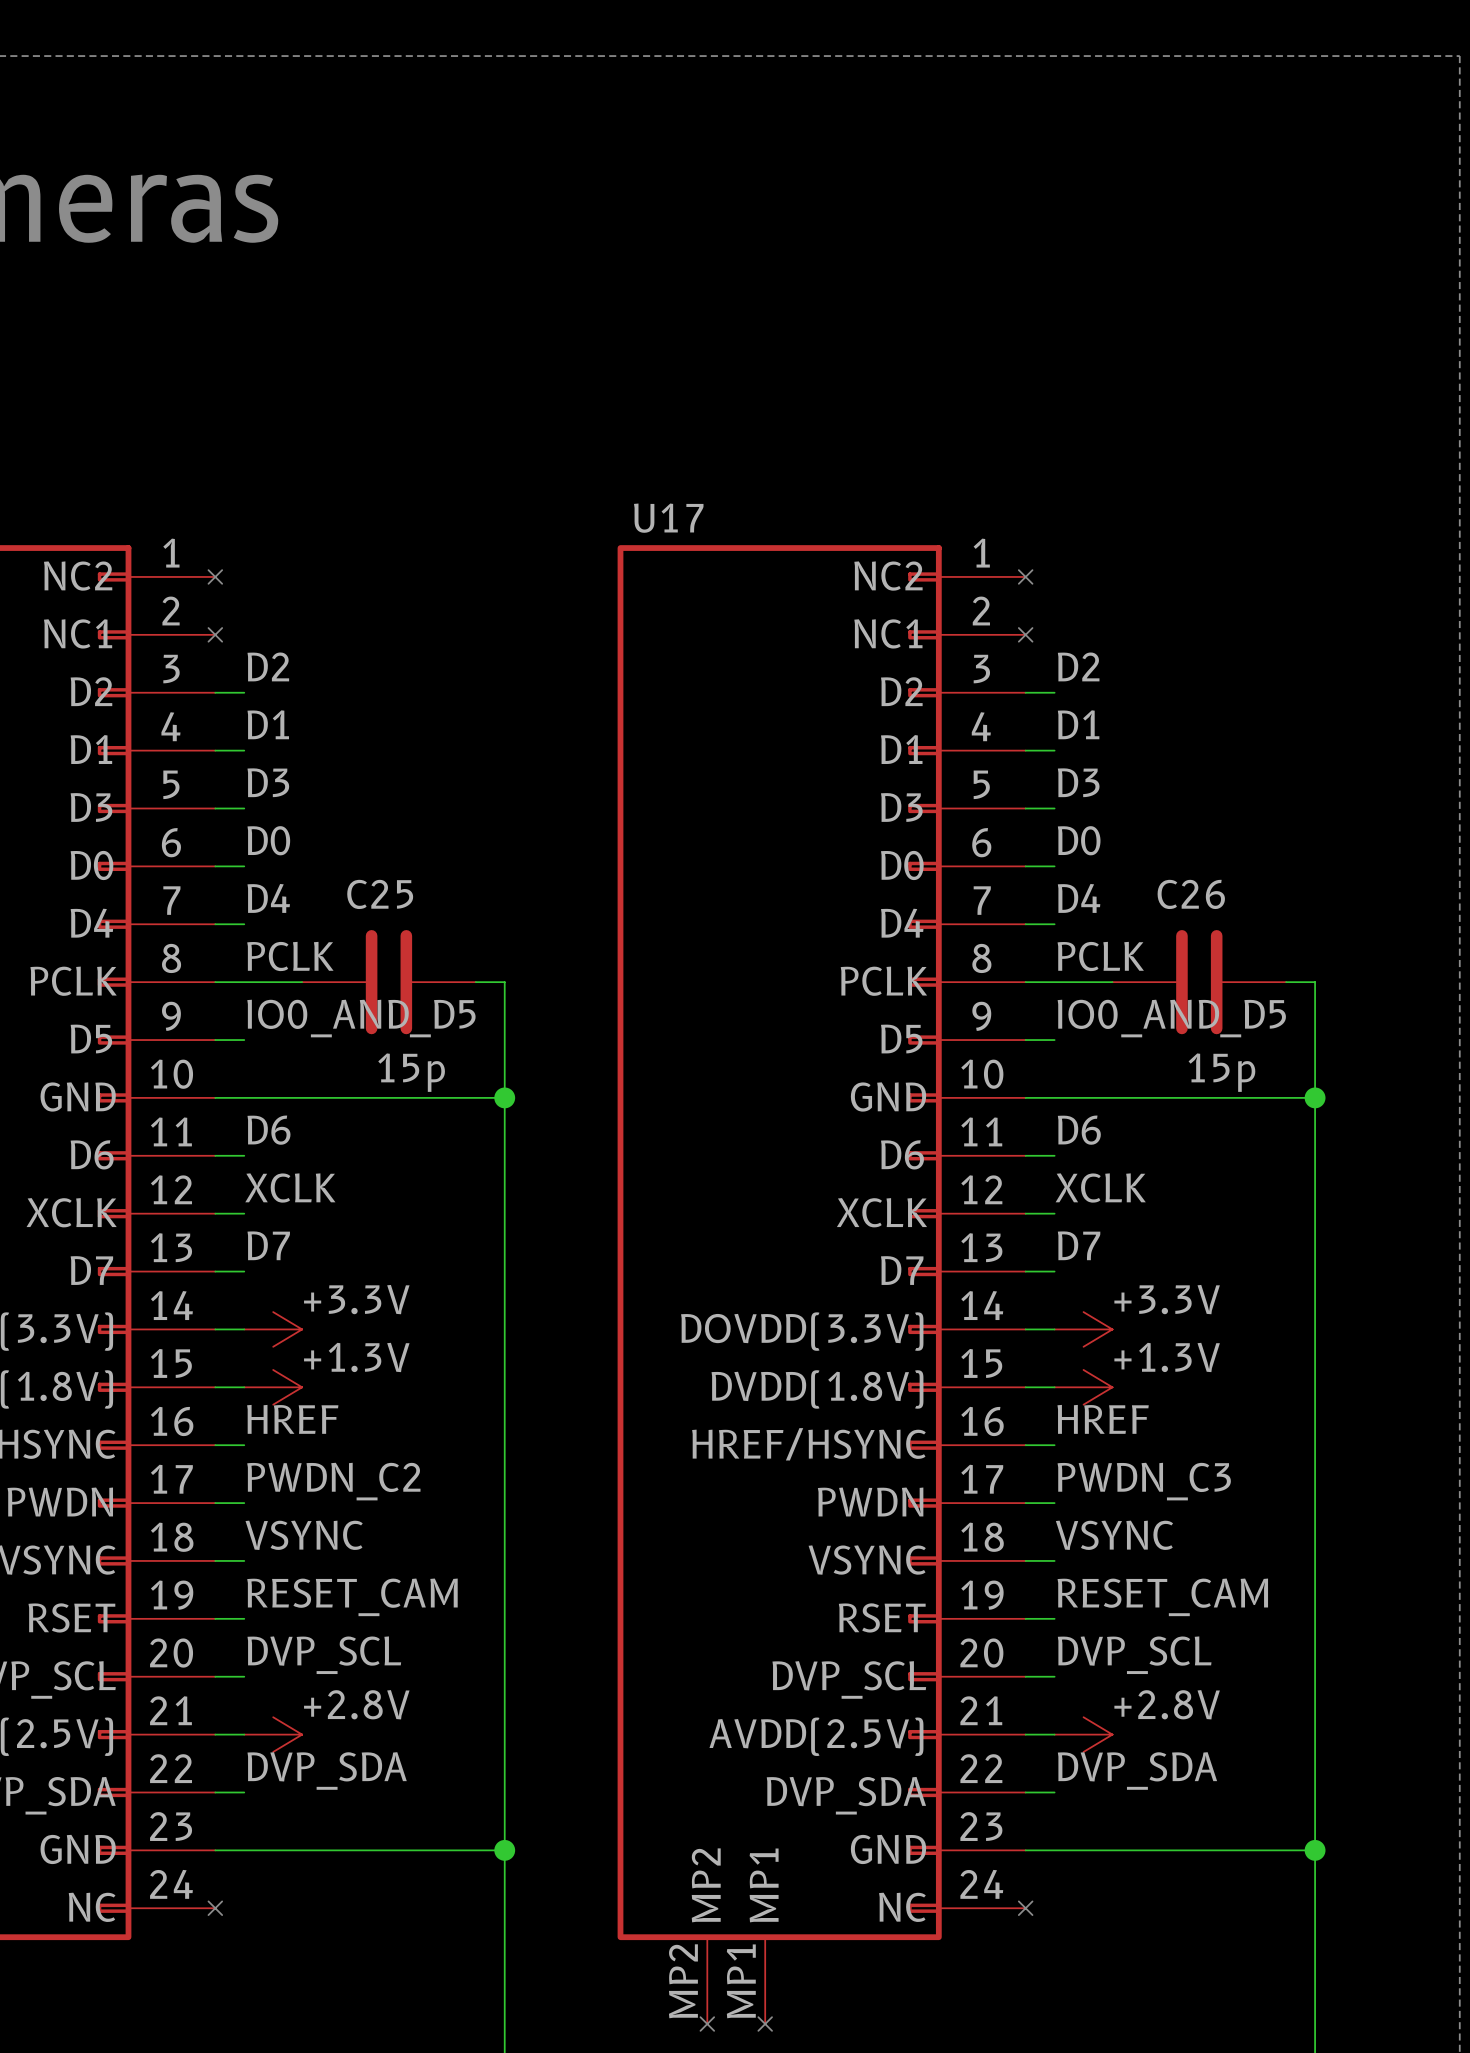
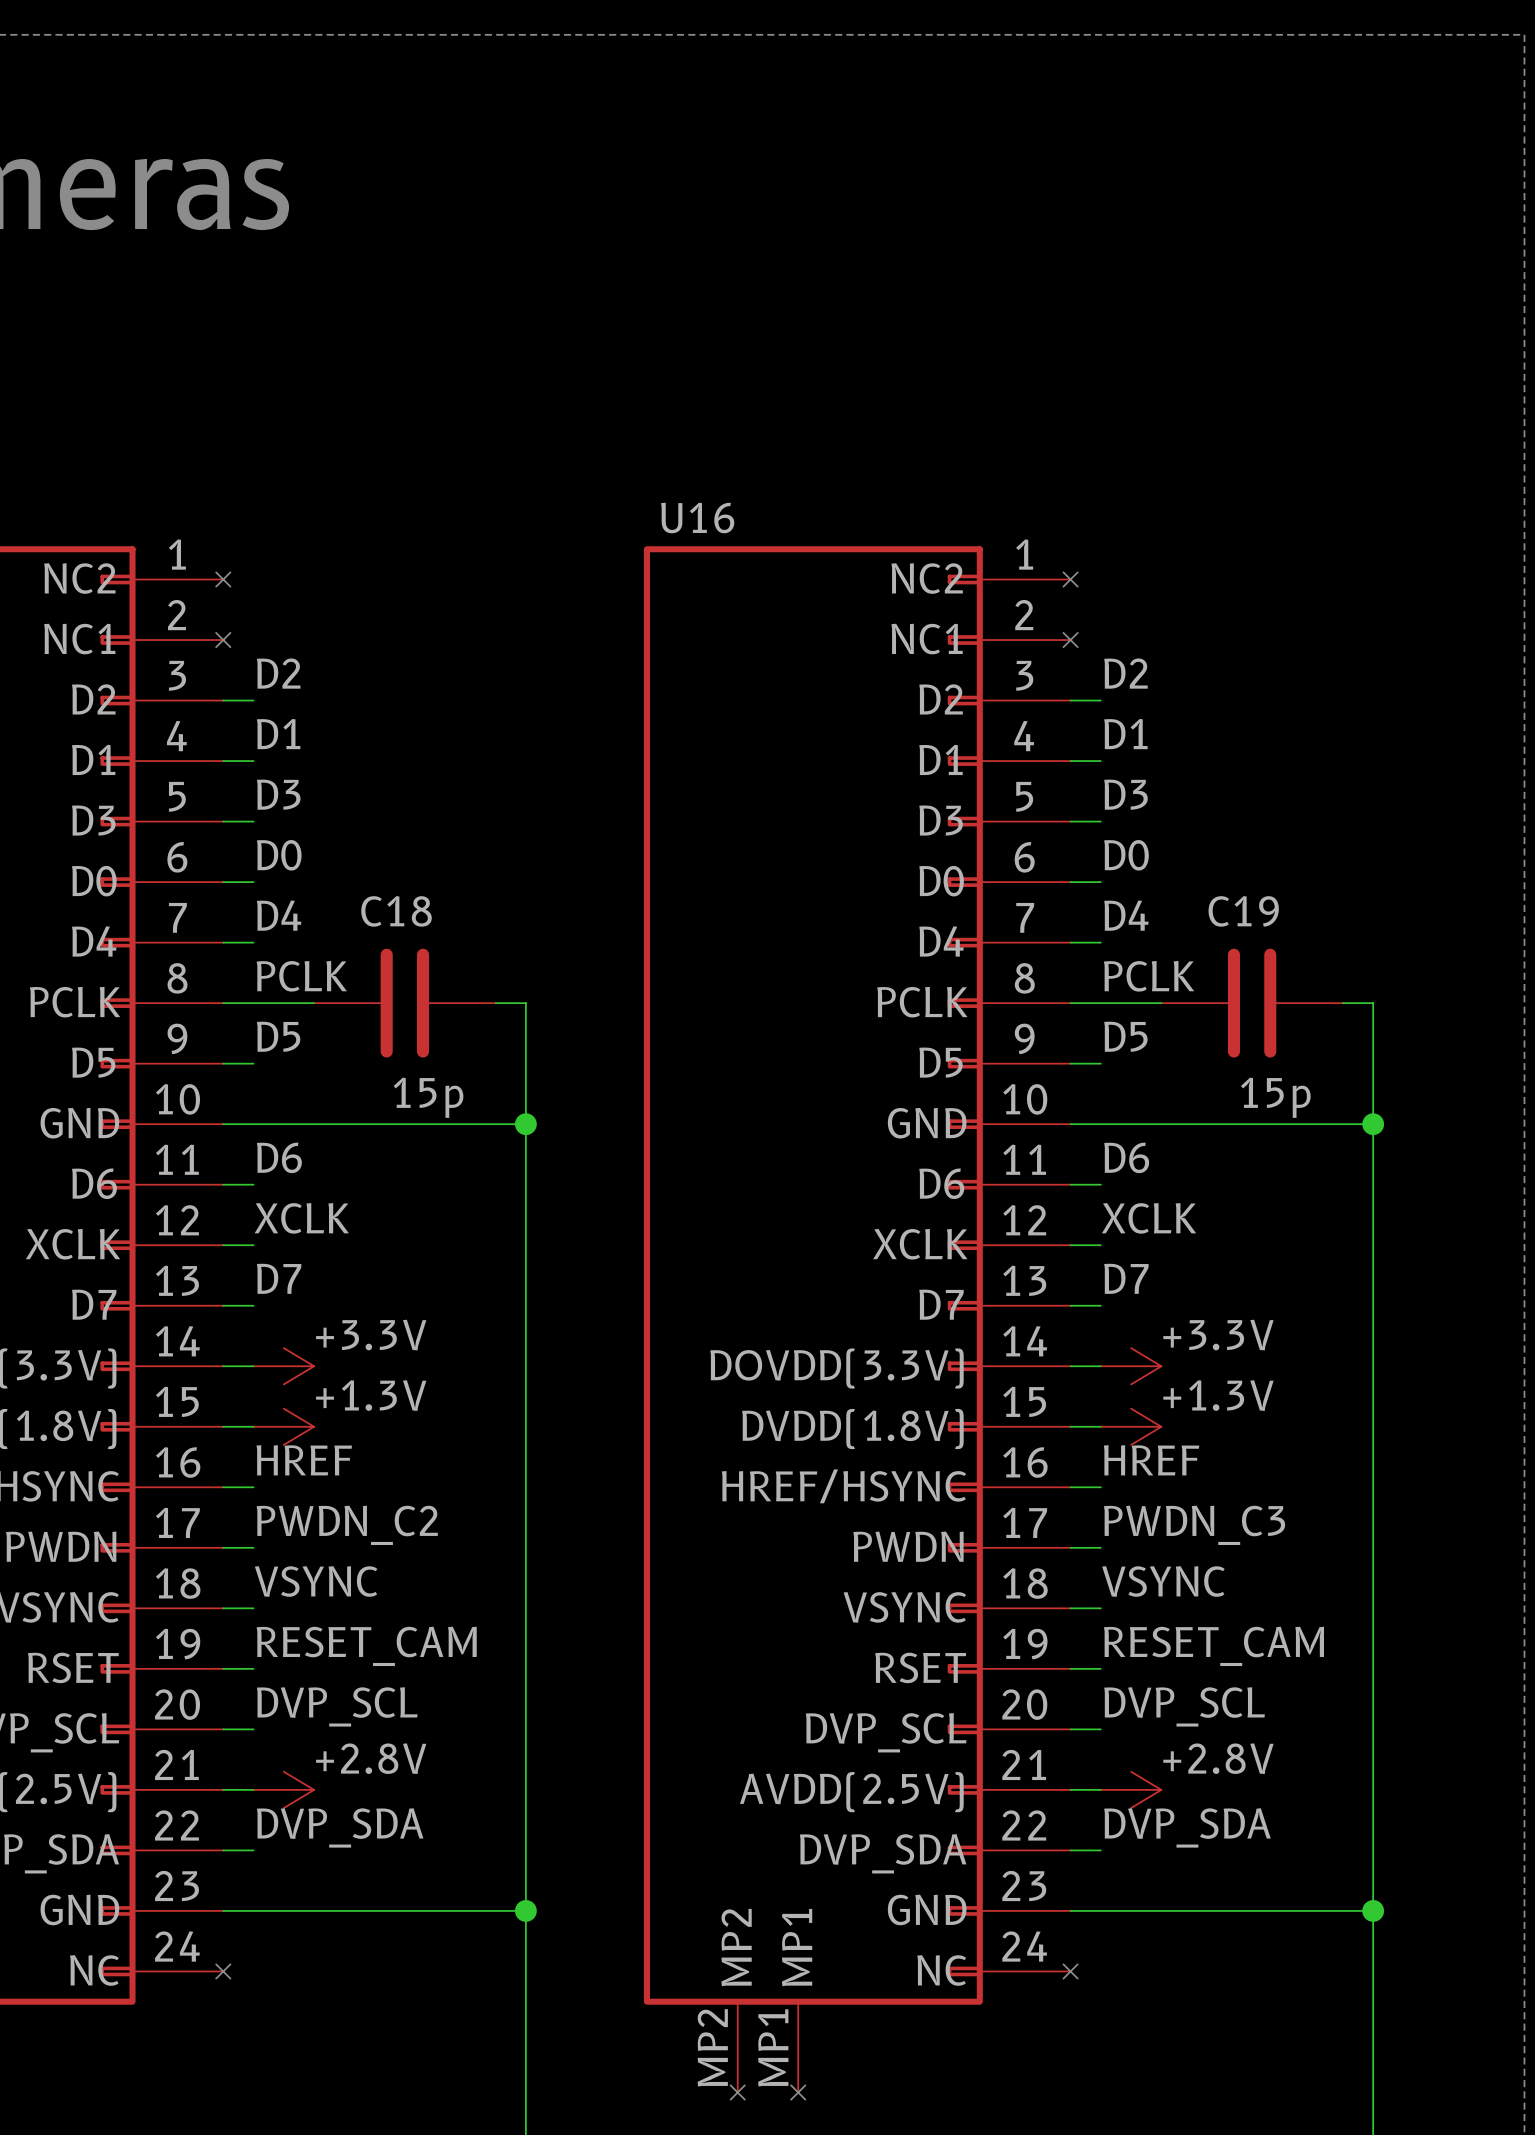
U17 name: U17 (668, 518) -> U16 (697, 518)
C25 name: C25 (380, 894) -> C18 (396, 911)
C26 name: C26 (1191, 894) -> C19 (1243, 911)
label: IO0_AND_D5 (361, 1018) -> D5 (278, 1036)
label: IO0_AND_D5 (1171, 1018) -> D5 (1125, 1036)

